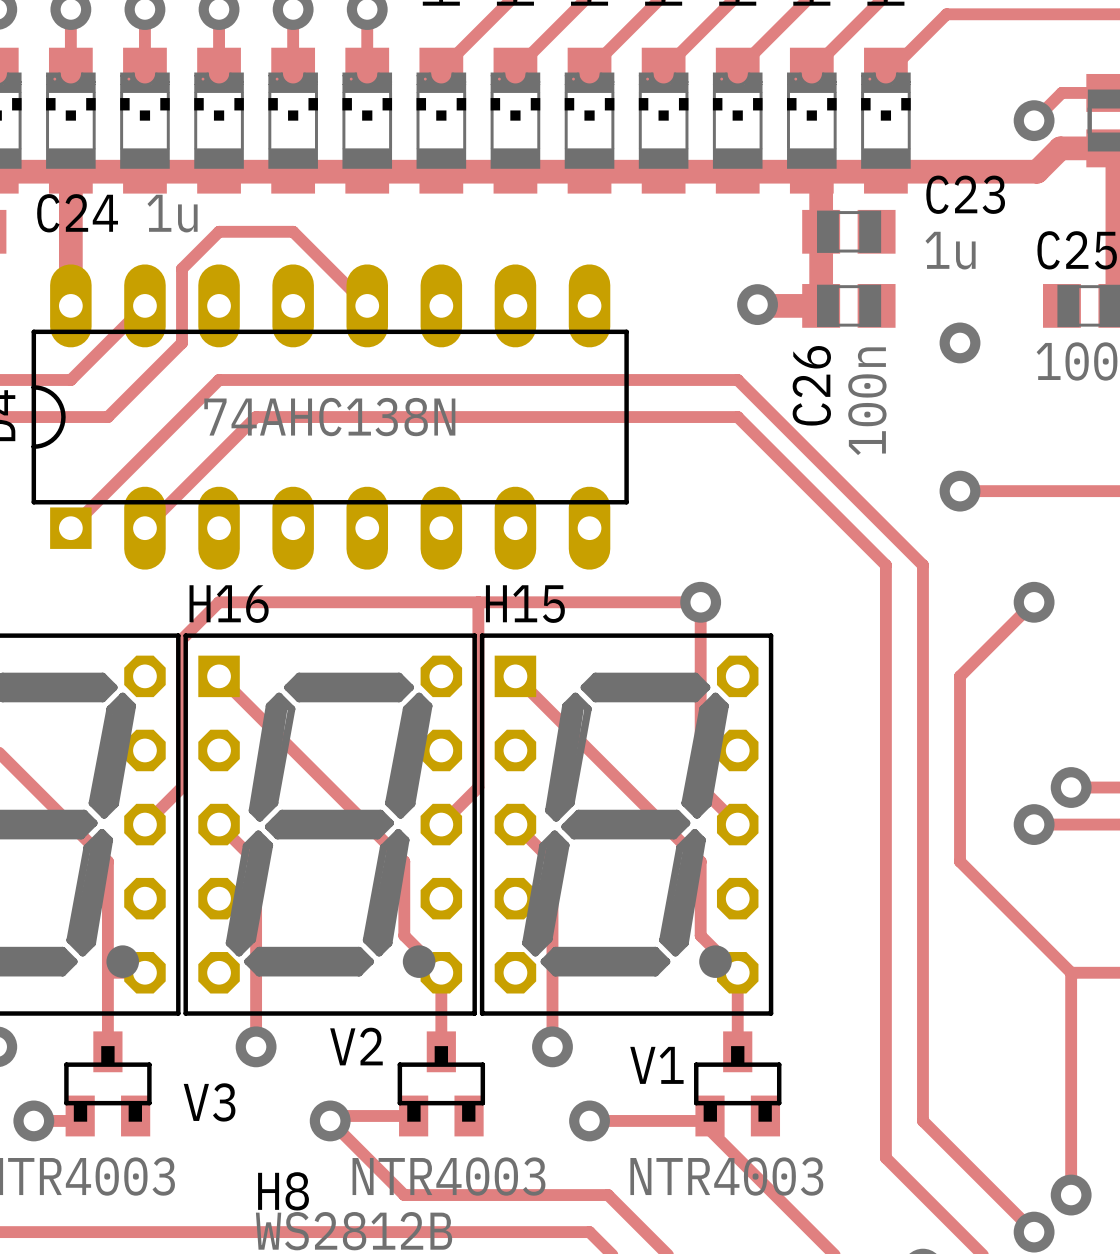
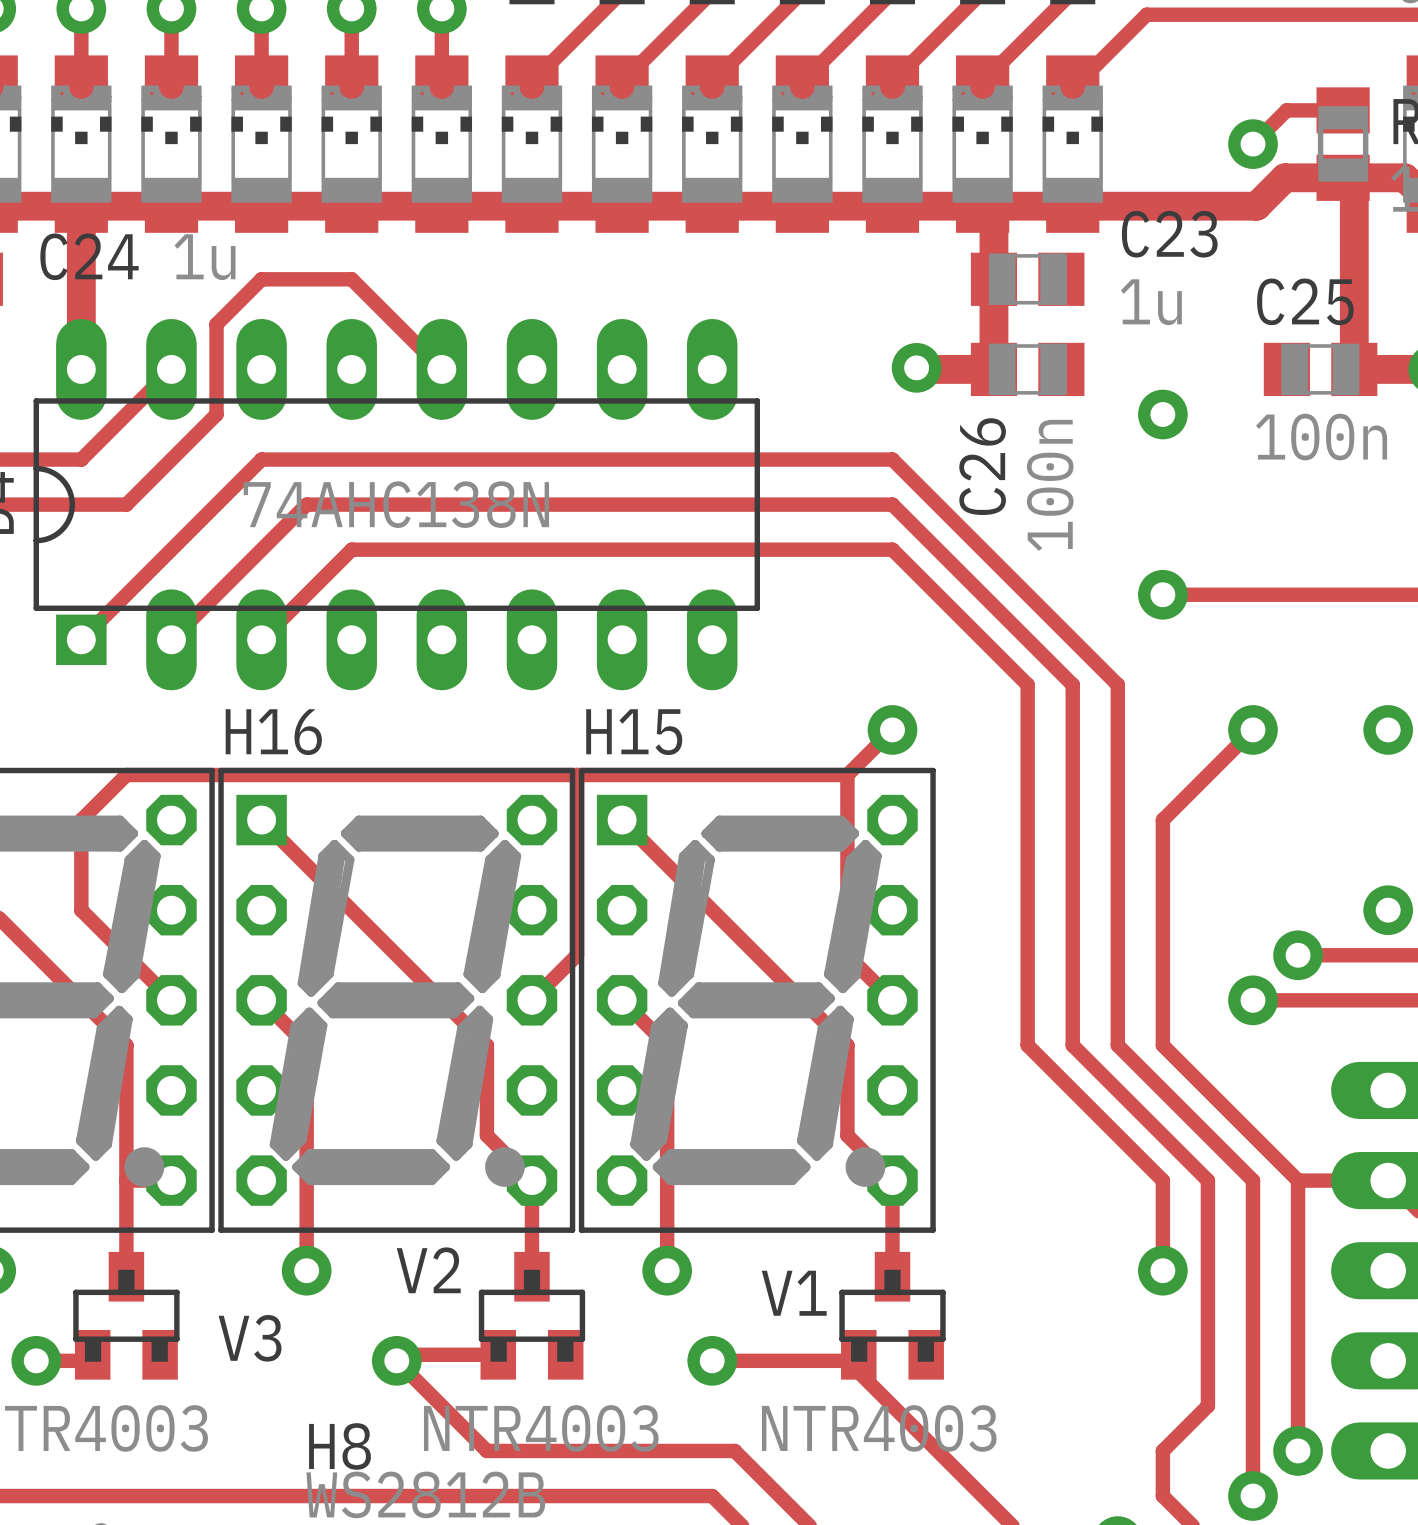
track: none -> (261, 639) (351, 549) (892, 549) (1027, 684) (1027, 1045) (1162, 1180) (1162, 1270)
track: (478, 602) (478, 639) -> none
via position: (700, 602) -> (892, 729)
track: (700, 639) (700, 602) (219, 602) (182, 639) (182, 787) (144, 824) -> (892, 729) (847, 775) (126, 775) (81, 820) (81, 910) (171, 1000)
track: (885, 861) (885, 1158) (960, 1232) -> (1072, 1045) (1207, 1180) (1207, 1405) (1162, 1450) (1162, 1496)
track: (922, 861) (922, 1120) (1034, 1232) -> (1117, 1045) (1253, 1180) (1253, 1496)
via: none -> (1162, 1270)

